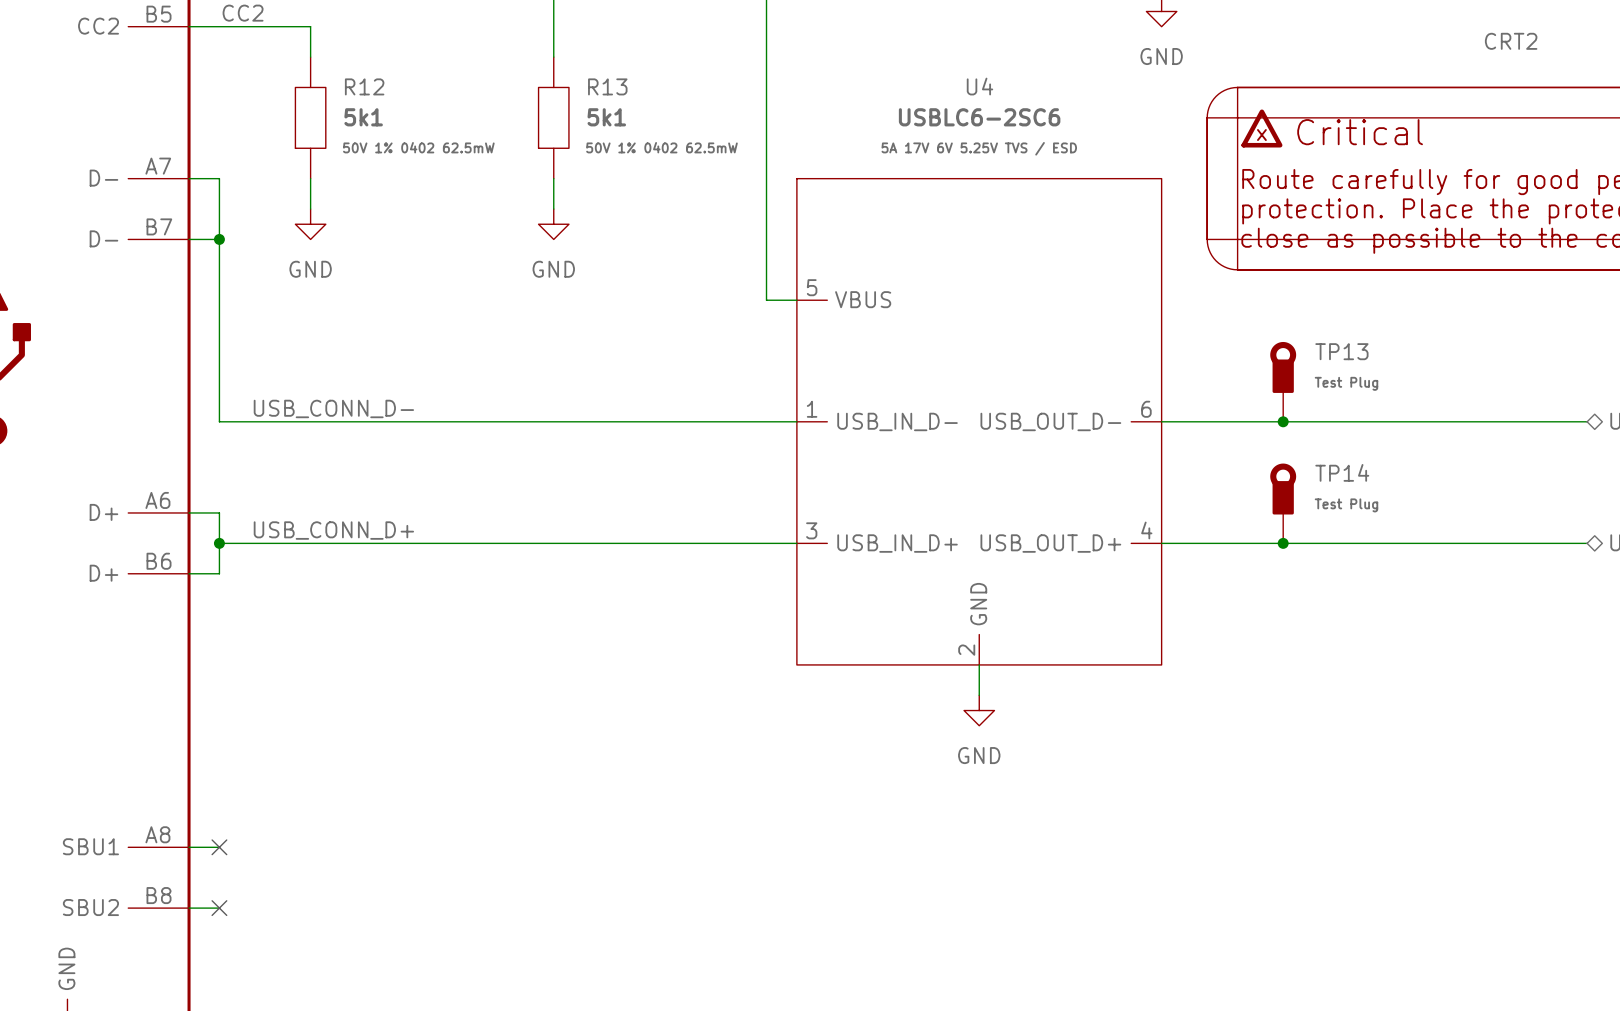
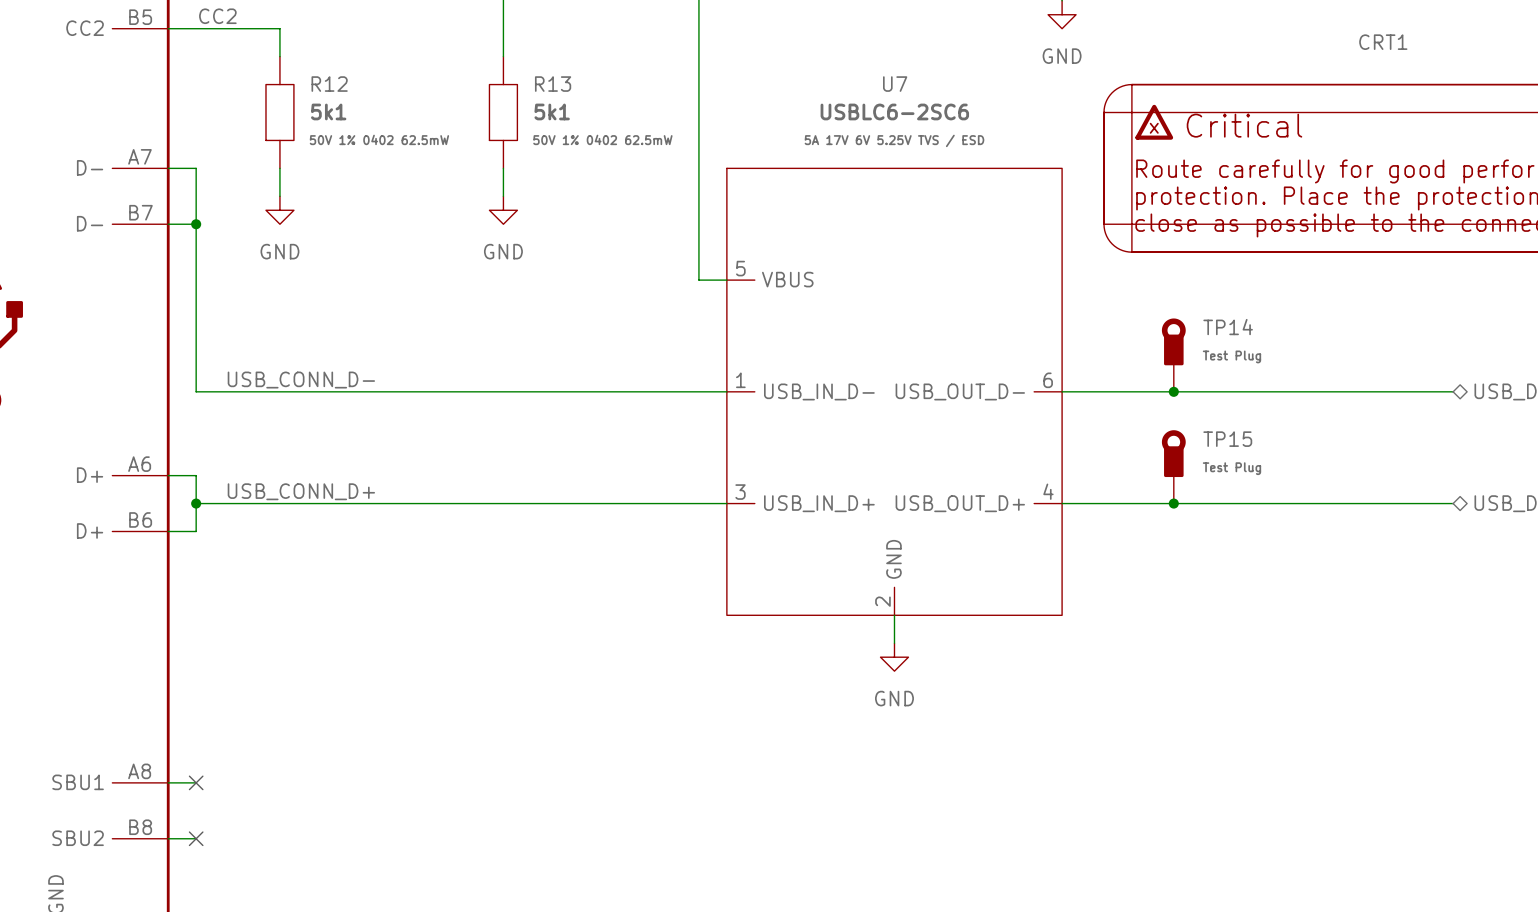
CRT2 name: CRT2 (1511, 41) -> CRT1 (1383, 42)
U4 name: U4 (979, 86) -> U7 (895, 84)
TP13 name: TP13 (1341, 351) -> TP14 (1228, 327)
TP14 name: TP14 (1342, 472) -> TP15 (1227, 439)

